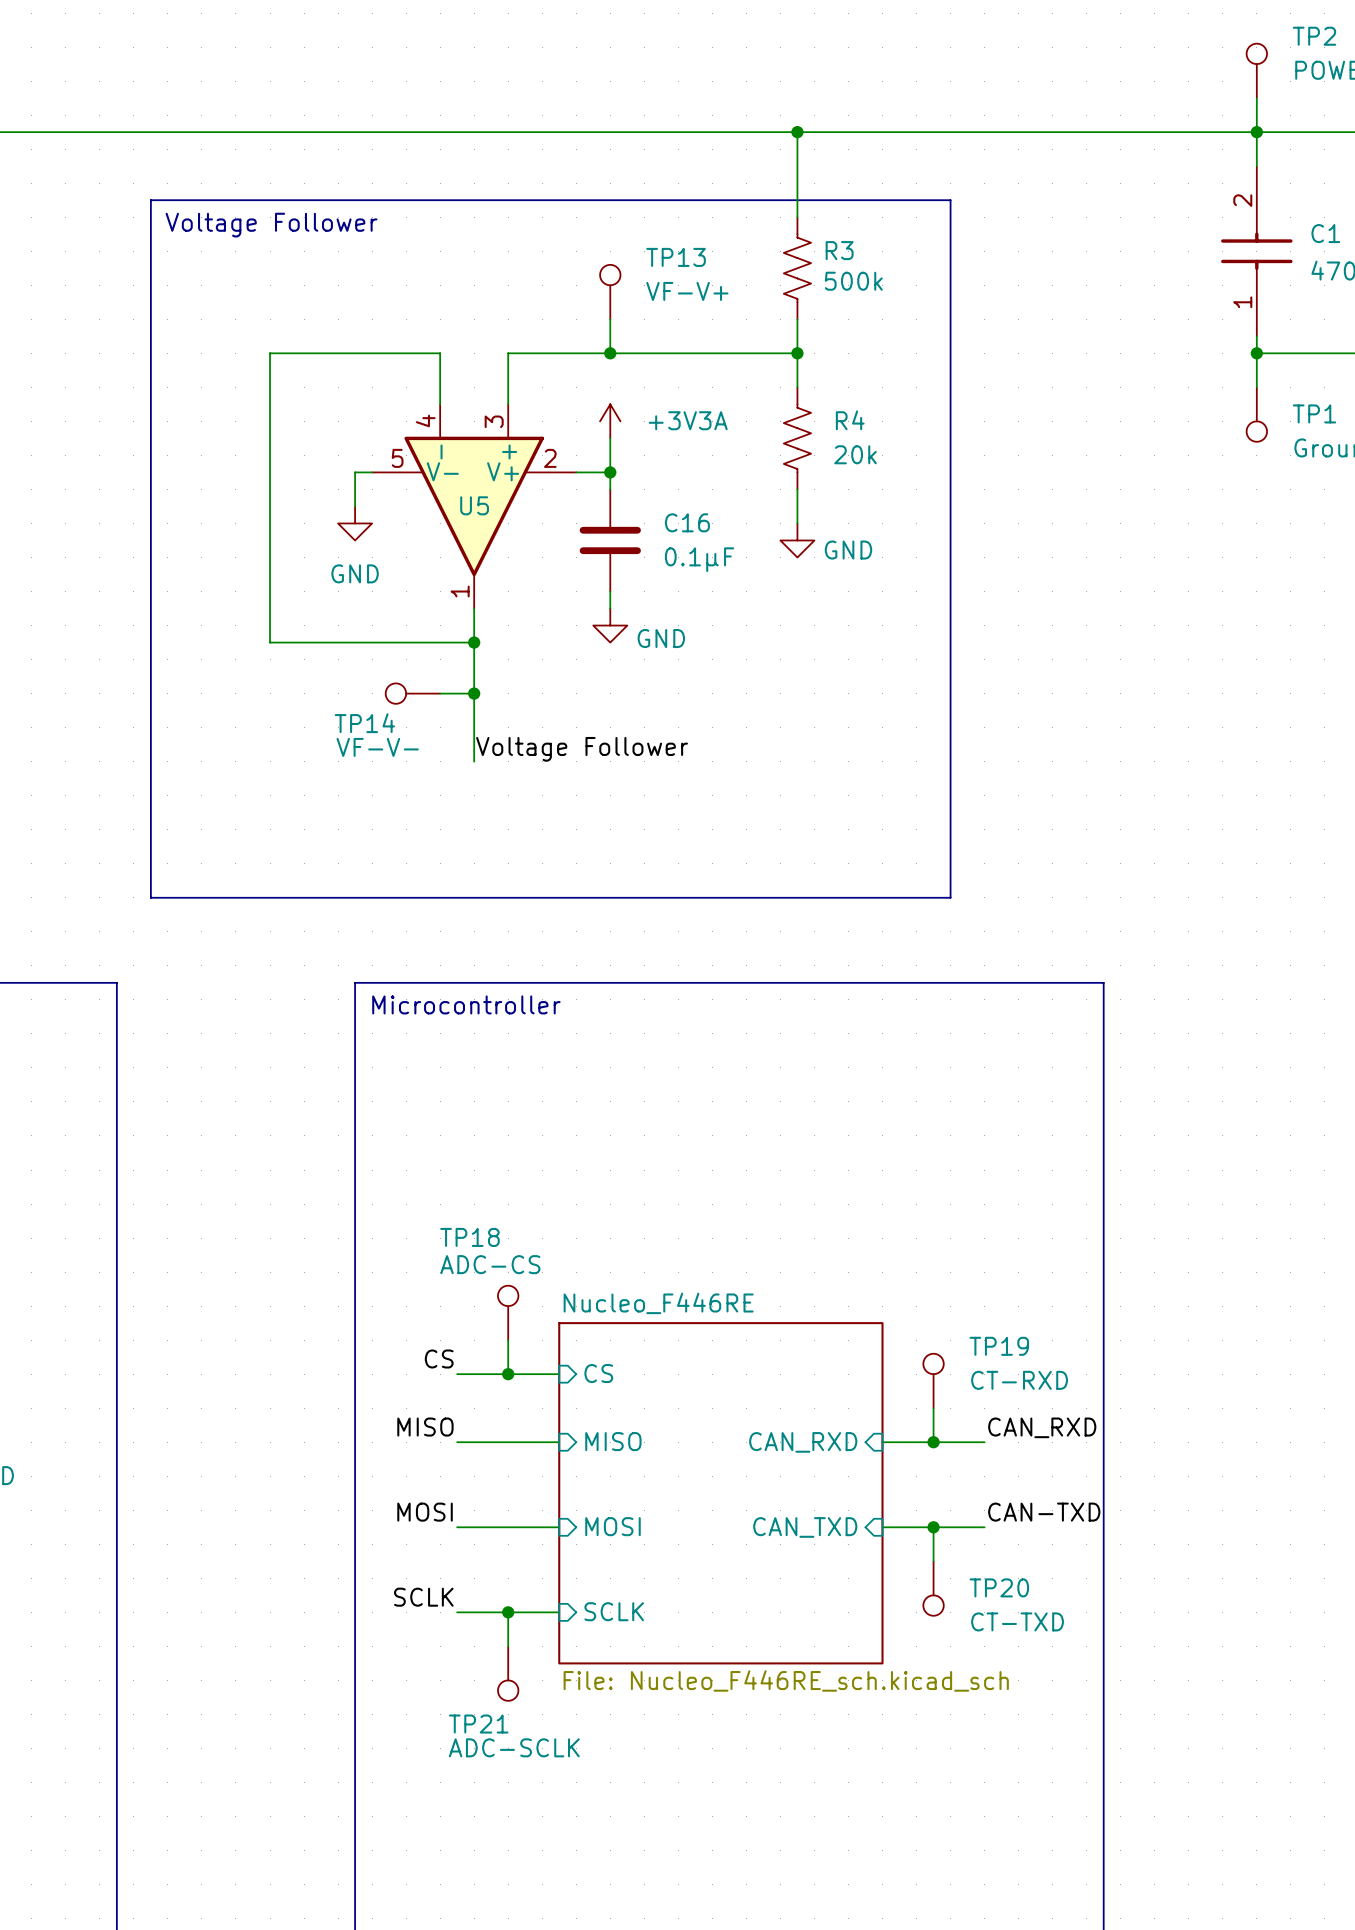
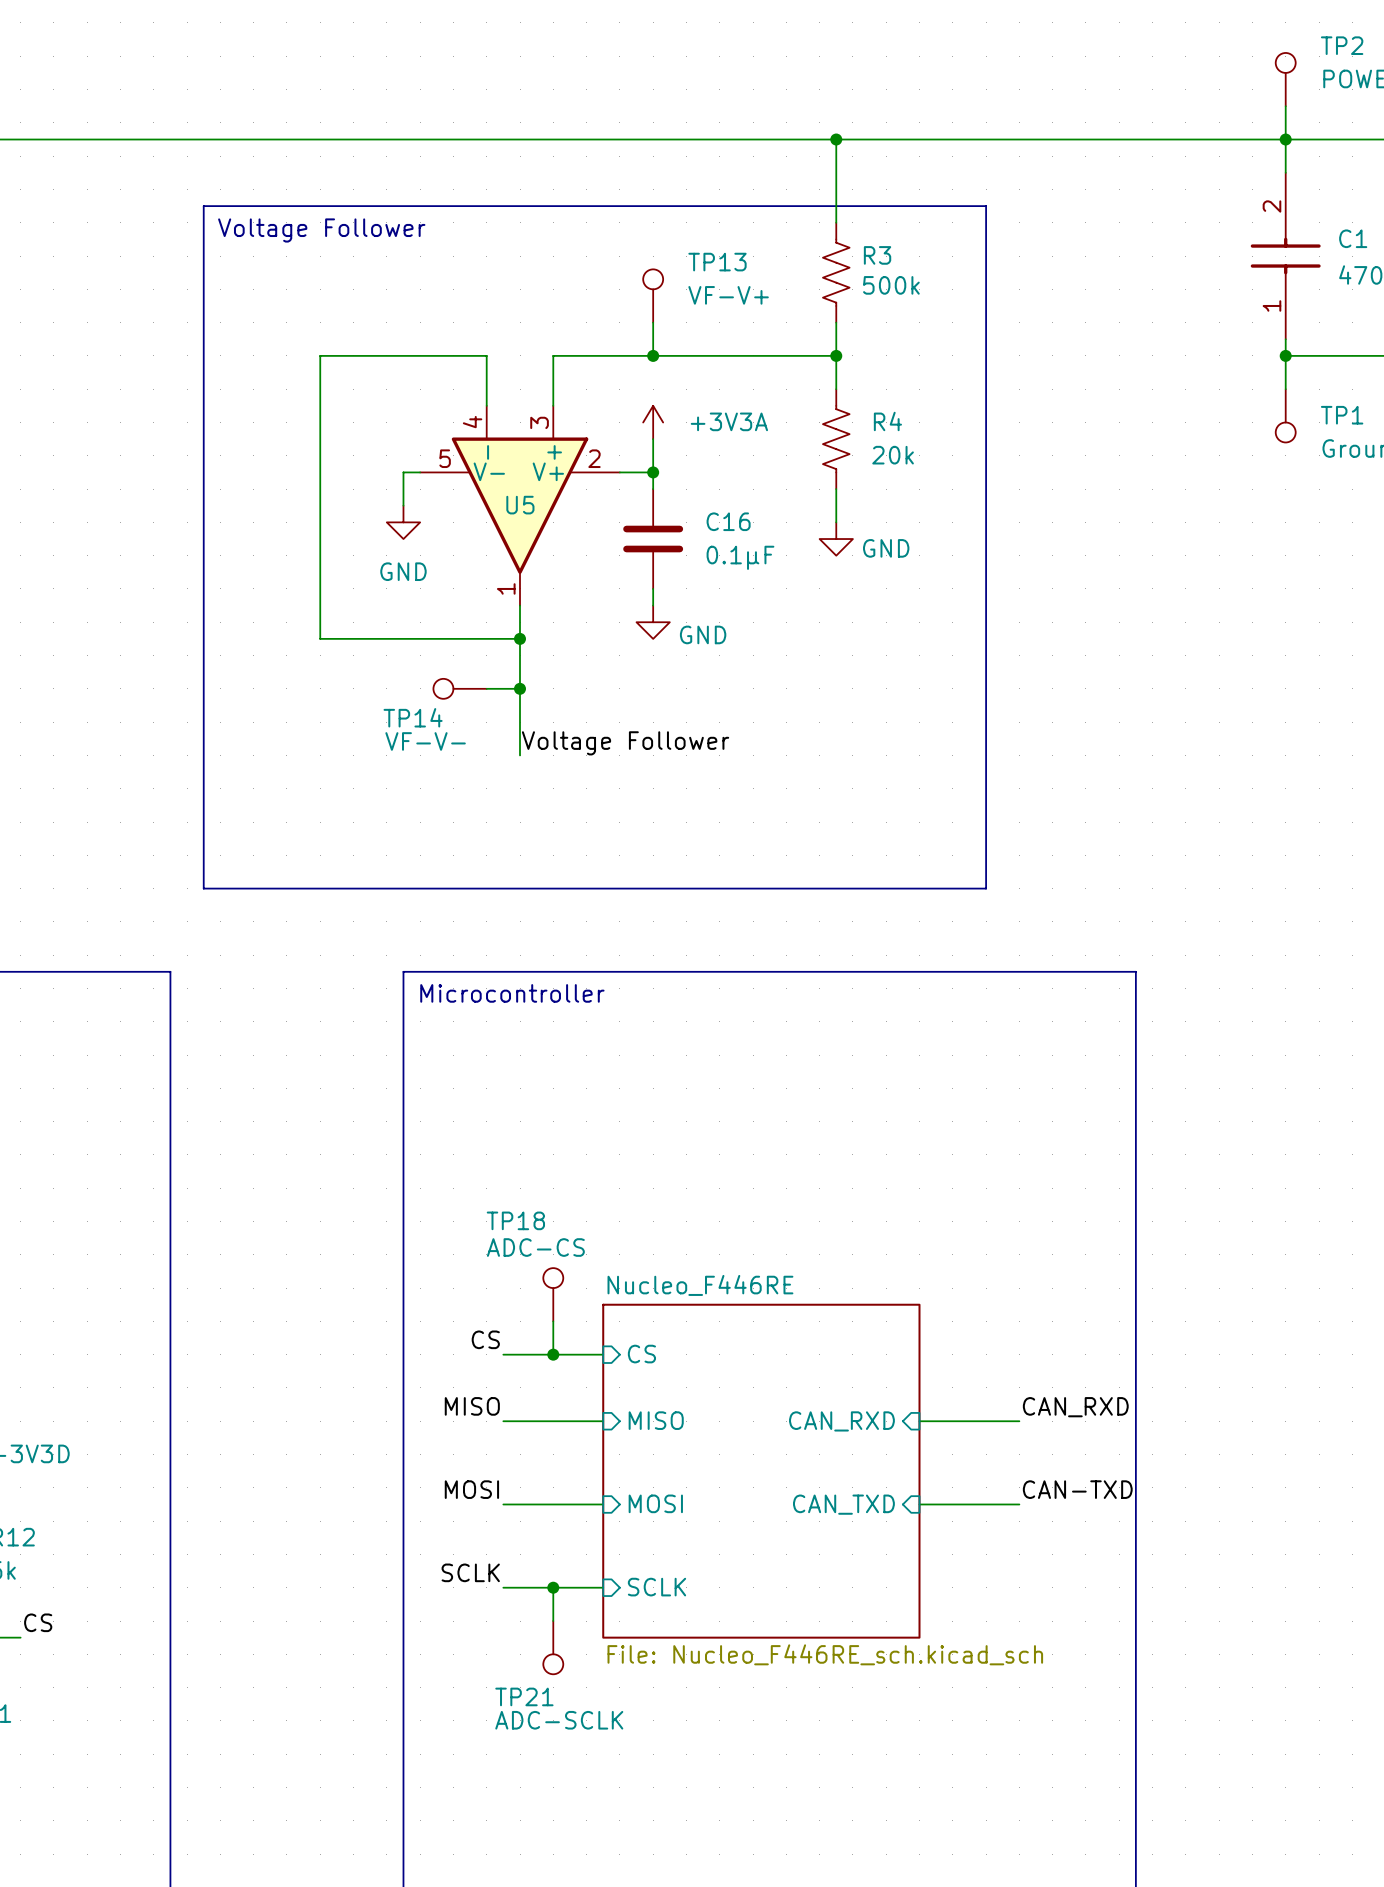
TP19: CT-RXD (933, 1380) -> none
wire: (933, 1408) (933, 1442) -> none
junction: (933, 1442) -> none
wire: (933, 1527) (933, 1561) -> none
junction: (933, 1527) -> none
TP20: CT-TXD (933, 1588) -> none

